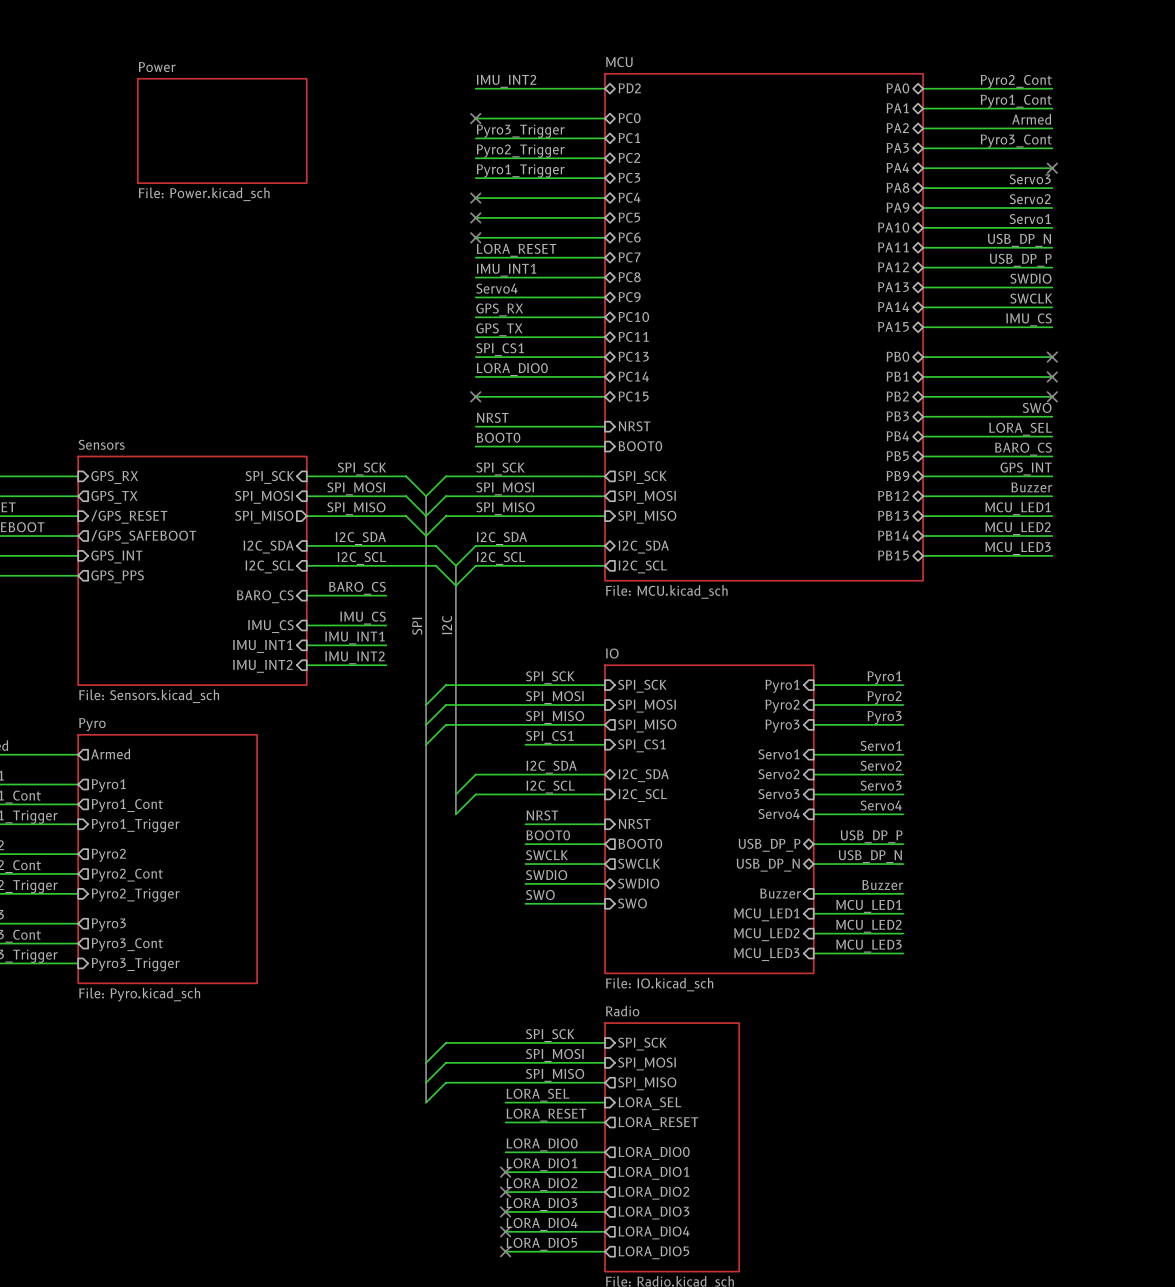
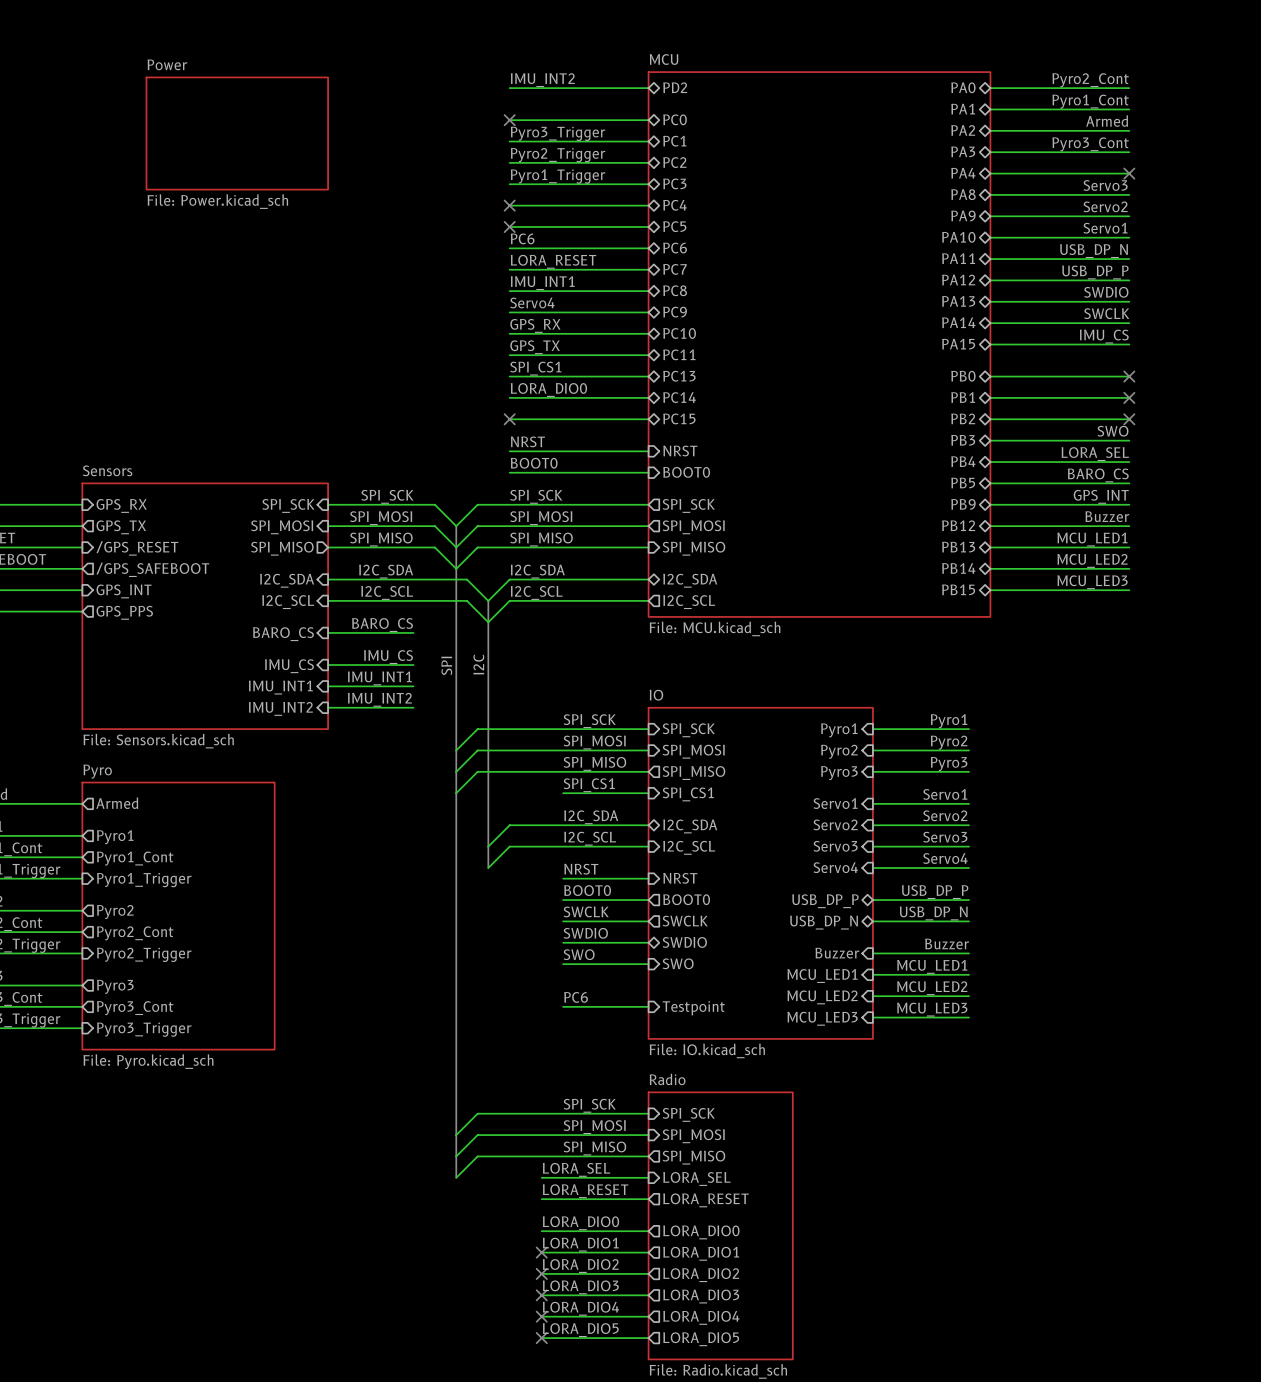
label: none -> PC6 (522, 238)
no-connect mark: (475, 237) -> none
label: none -> PC6 (576, 997)
wire: none -> (563, 1006) (648, 1006)
sheet pin: none -> Testpoint (693, 1008)

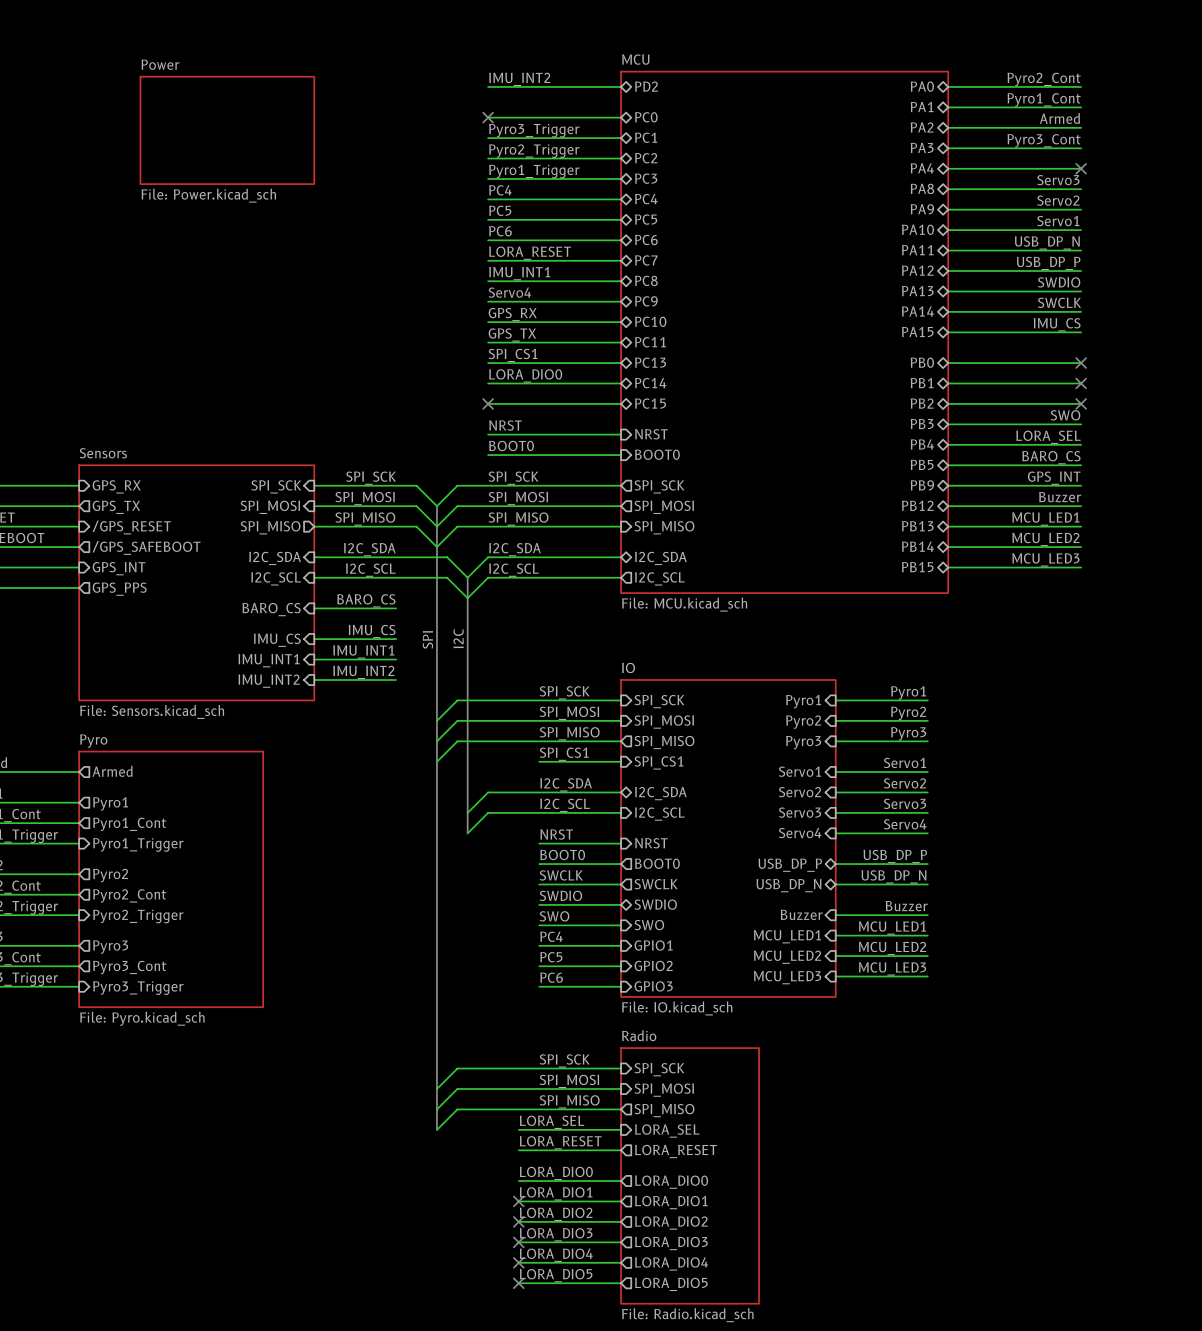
label: none -> PC4 (500, 190)
no-connect mark: (509, 205) -> none
label: none -> PC5 (500, 210)
no-connect mark: (509, 227) -> none
label: none -> PC4 (551, 936)
wire: none -> (539, 945) (621, 945)
sheet pin: none -> GPIO1 (653, 945)
label: PC6 (576, 997) -> PC5 (551, 957)
sheet pin: Testpoint (693, 1008) -> GPIO2 (653, 965)
label: none -> PC6 (551, 977)
sheet pin: none -> GPIO3 (653, 986)
wire: none -> (539, 986) (621, 986)

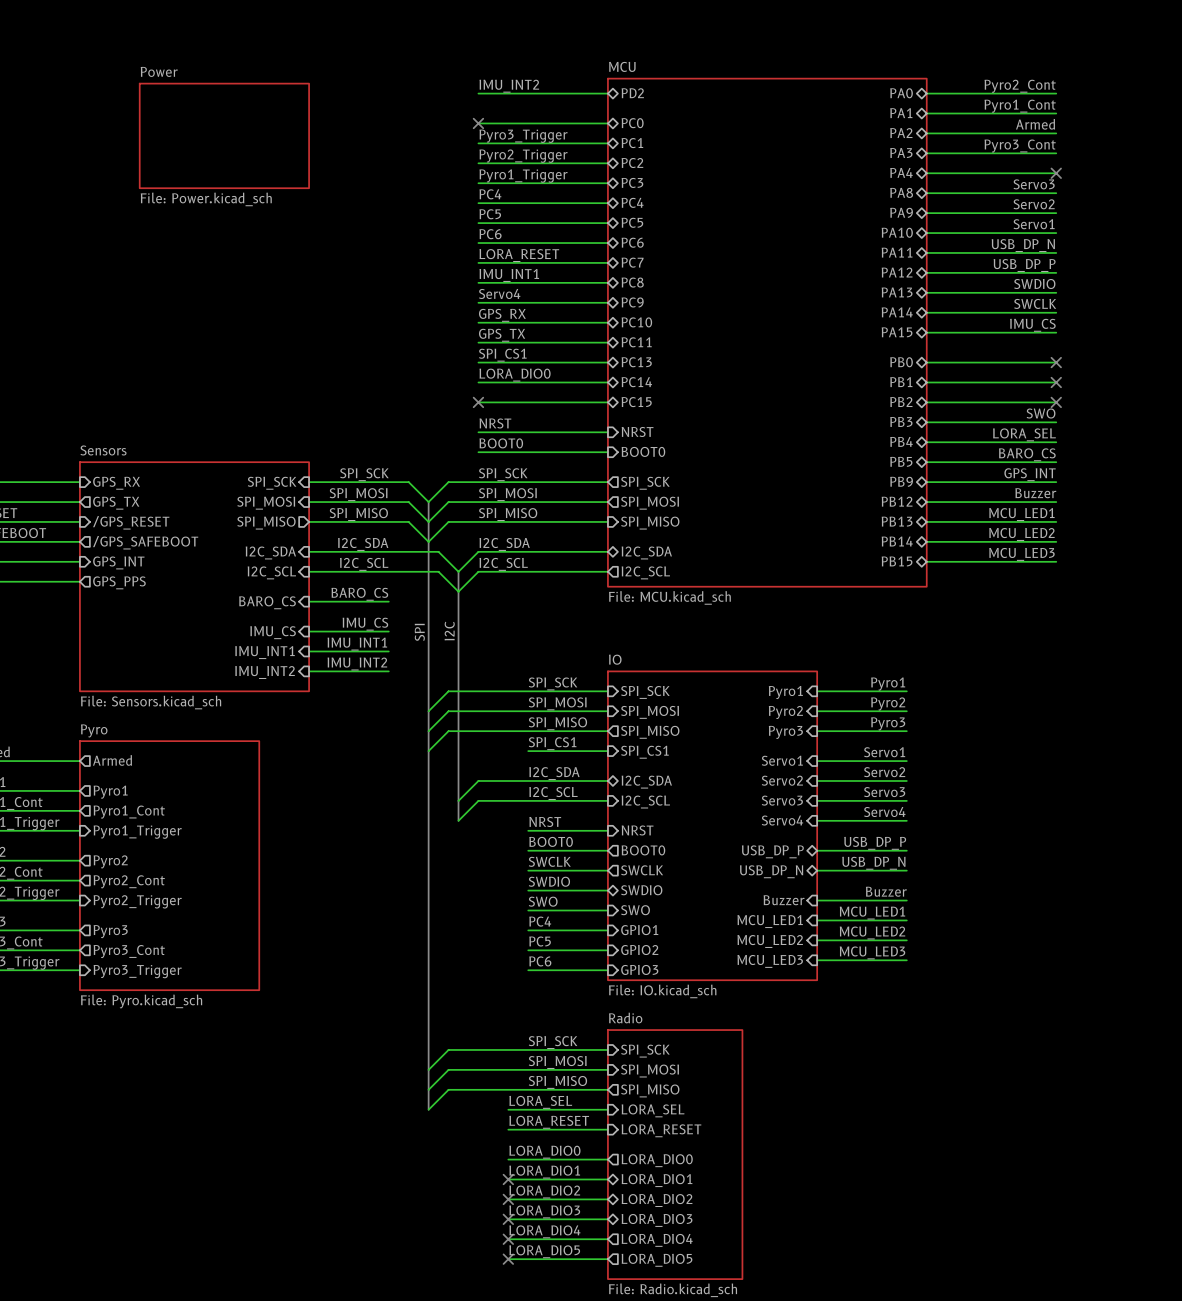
sheet pin shape: output (675, 1151) -> input (661, 1130)
sheet pin shape: output (671, 1202) -> bidirectional (657, 1180)
sheet pin shape: output (671, 1223) -> bidirectional (657, 1200)
sheet pin shape: output (671, 1243) -> bidirectional (657, 1220)

